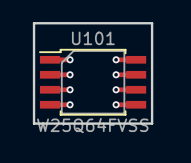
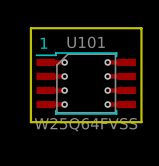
text: none -> 1 (44, 43)

